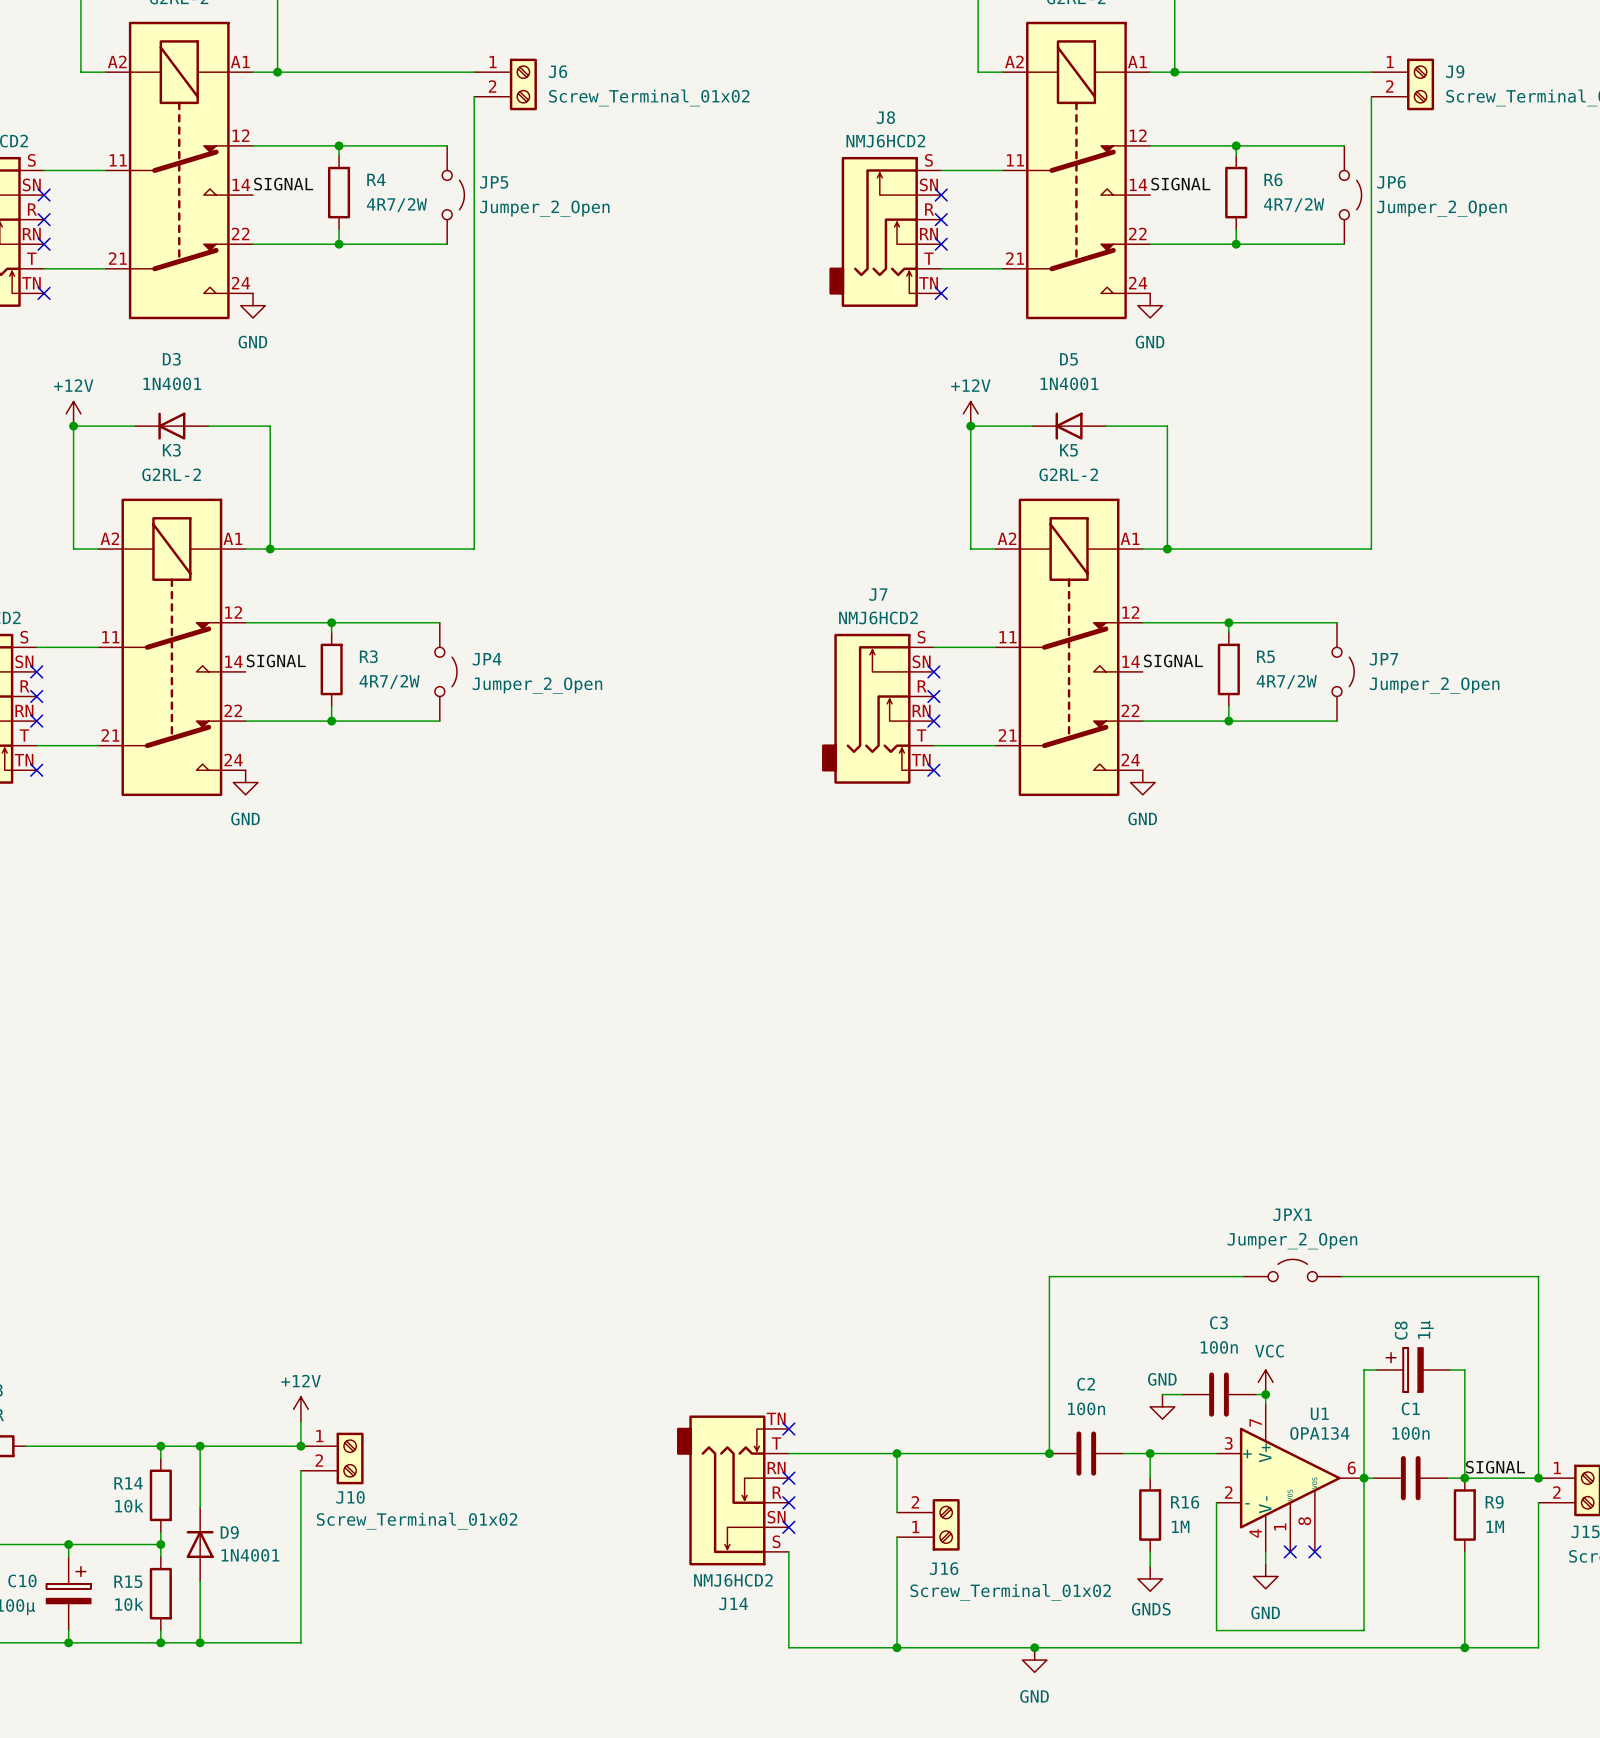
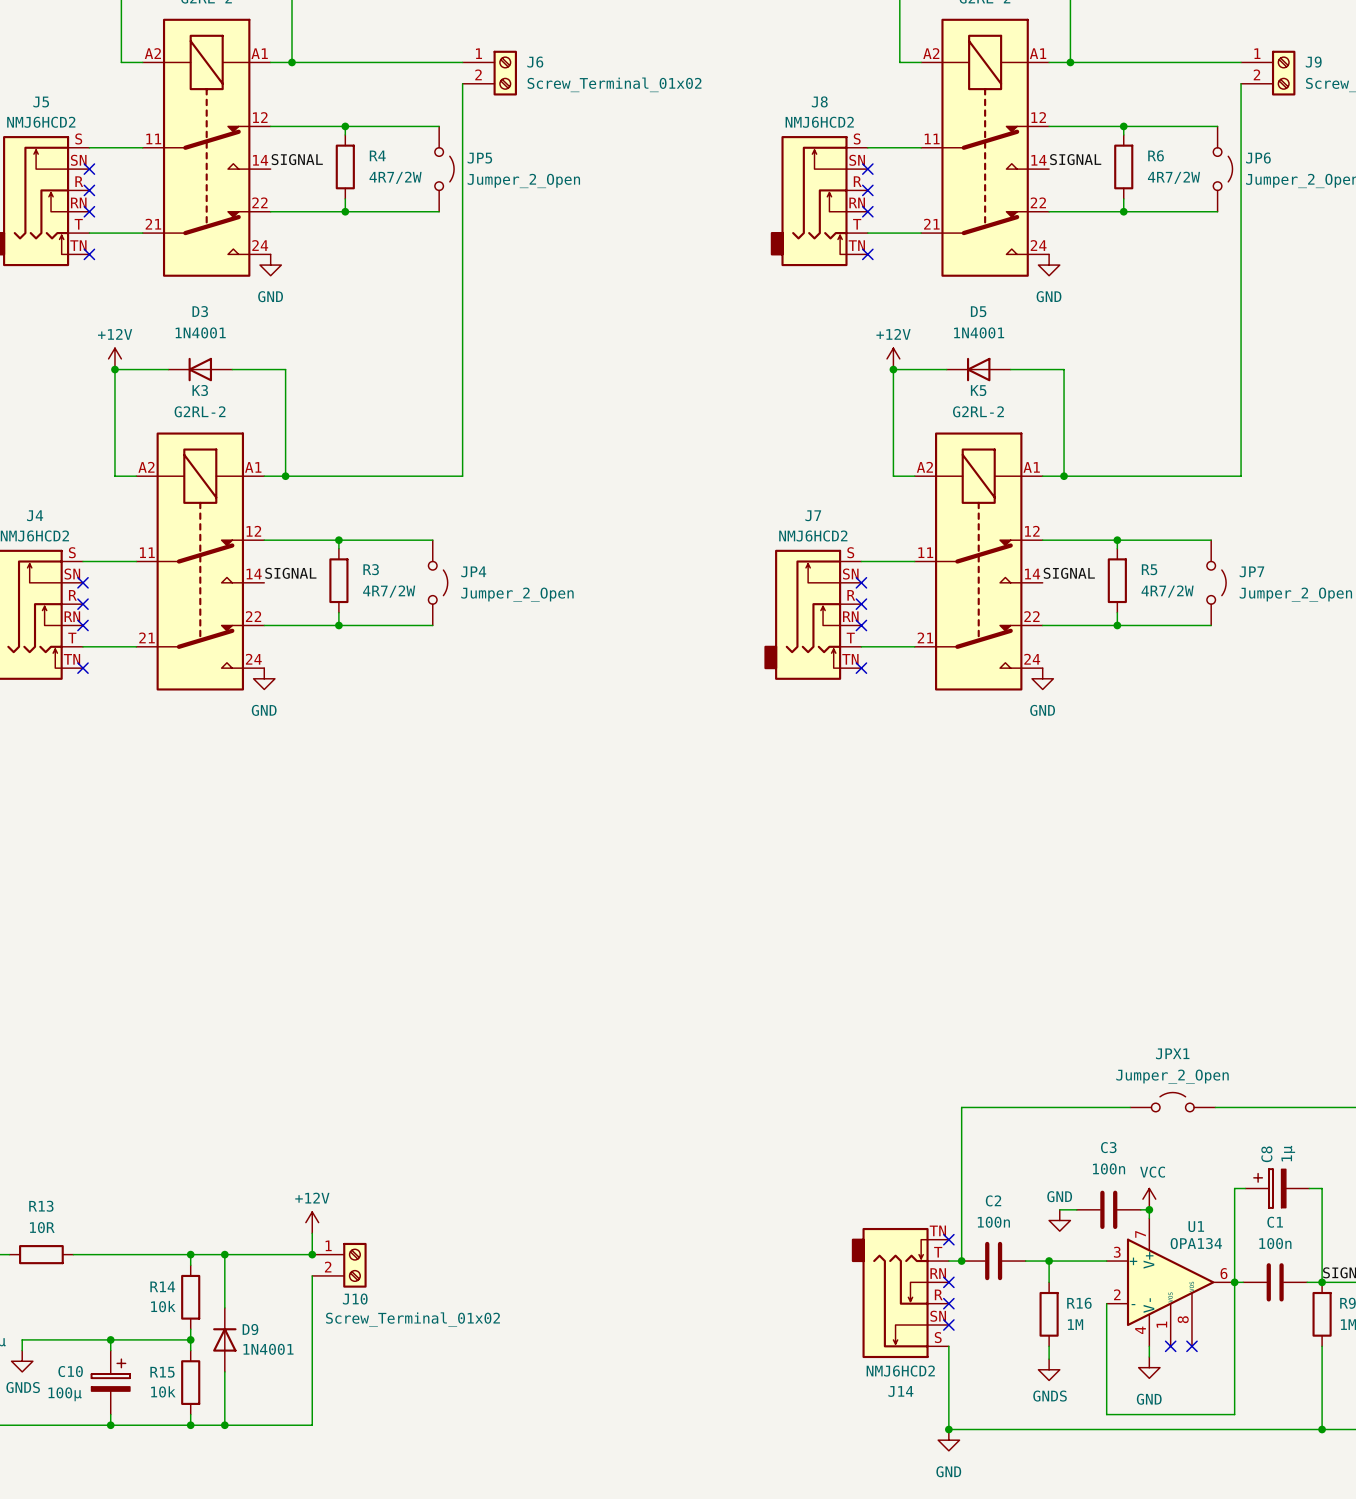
no-connect mark: (788, 1428) -> none
no-connect mark: none -> (948, 1239)
wire: (788, 1453) (1034, 1453) -> none
wire: (897, 1453) (897, 1512) -> none
junction: (897, 1453) -> none
no-connect mark: (788, 1478) -> none
no-connect mark: none -> (948, 1282)
J14 position: (732, 1490) -> (900, 1293)
no-connect mark: (788, 1502) -> none
no-connect mark: none -> (948, 1303)
J16: Screw_Terminal_01x02 (928, 1524) -> none
no-connect mark: (788, 1527) -> none
no-connect mark: none -> (948, 1325)
wire: (897, 1537) (897, 1647) -> none
wire: (788, 1551) (788, 1647) (1034, 1647) -> (948, 1346) (948, 1429)
junction: (897, 1647) -> none

